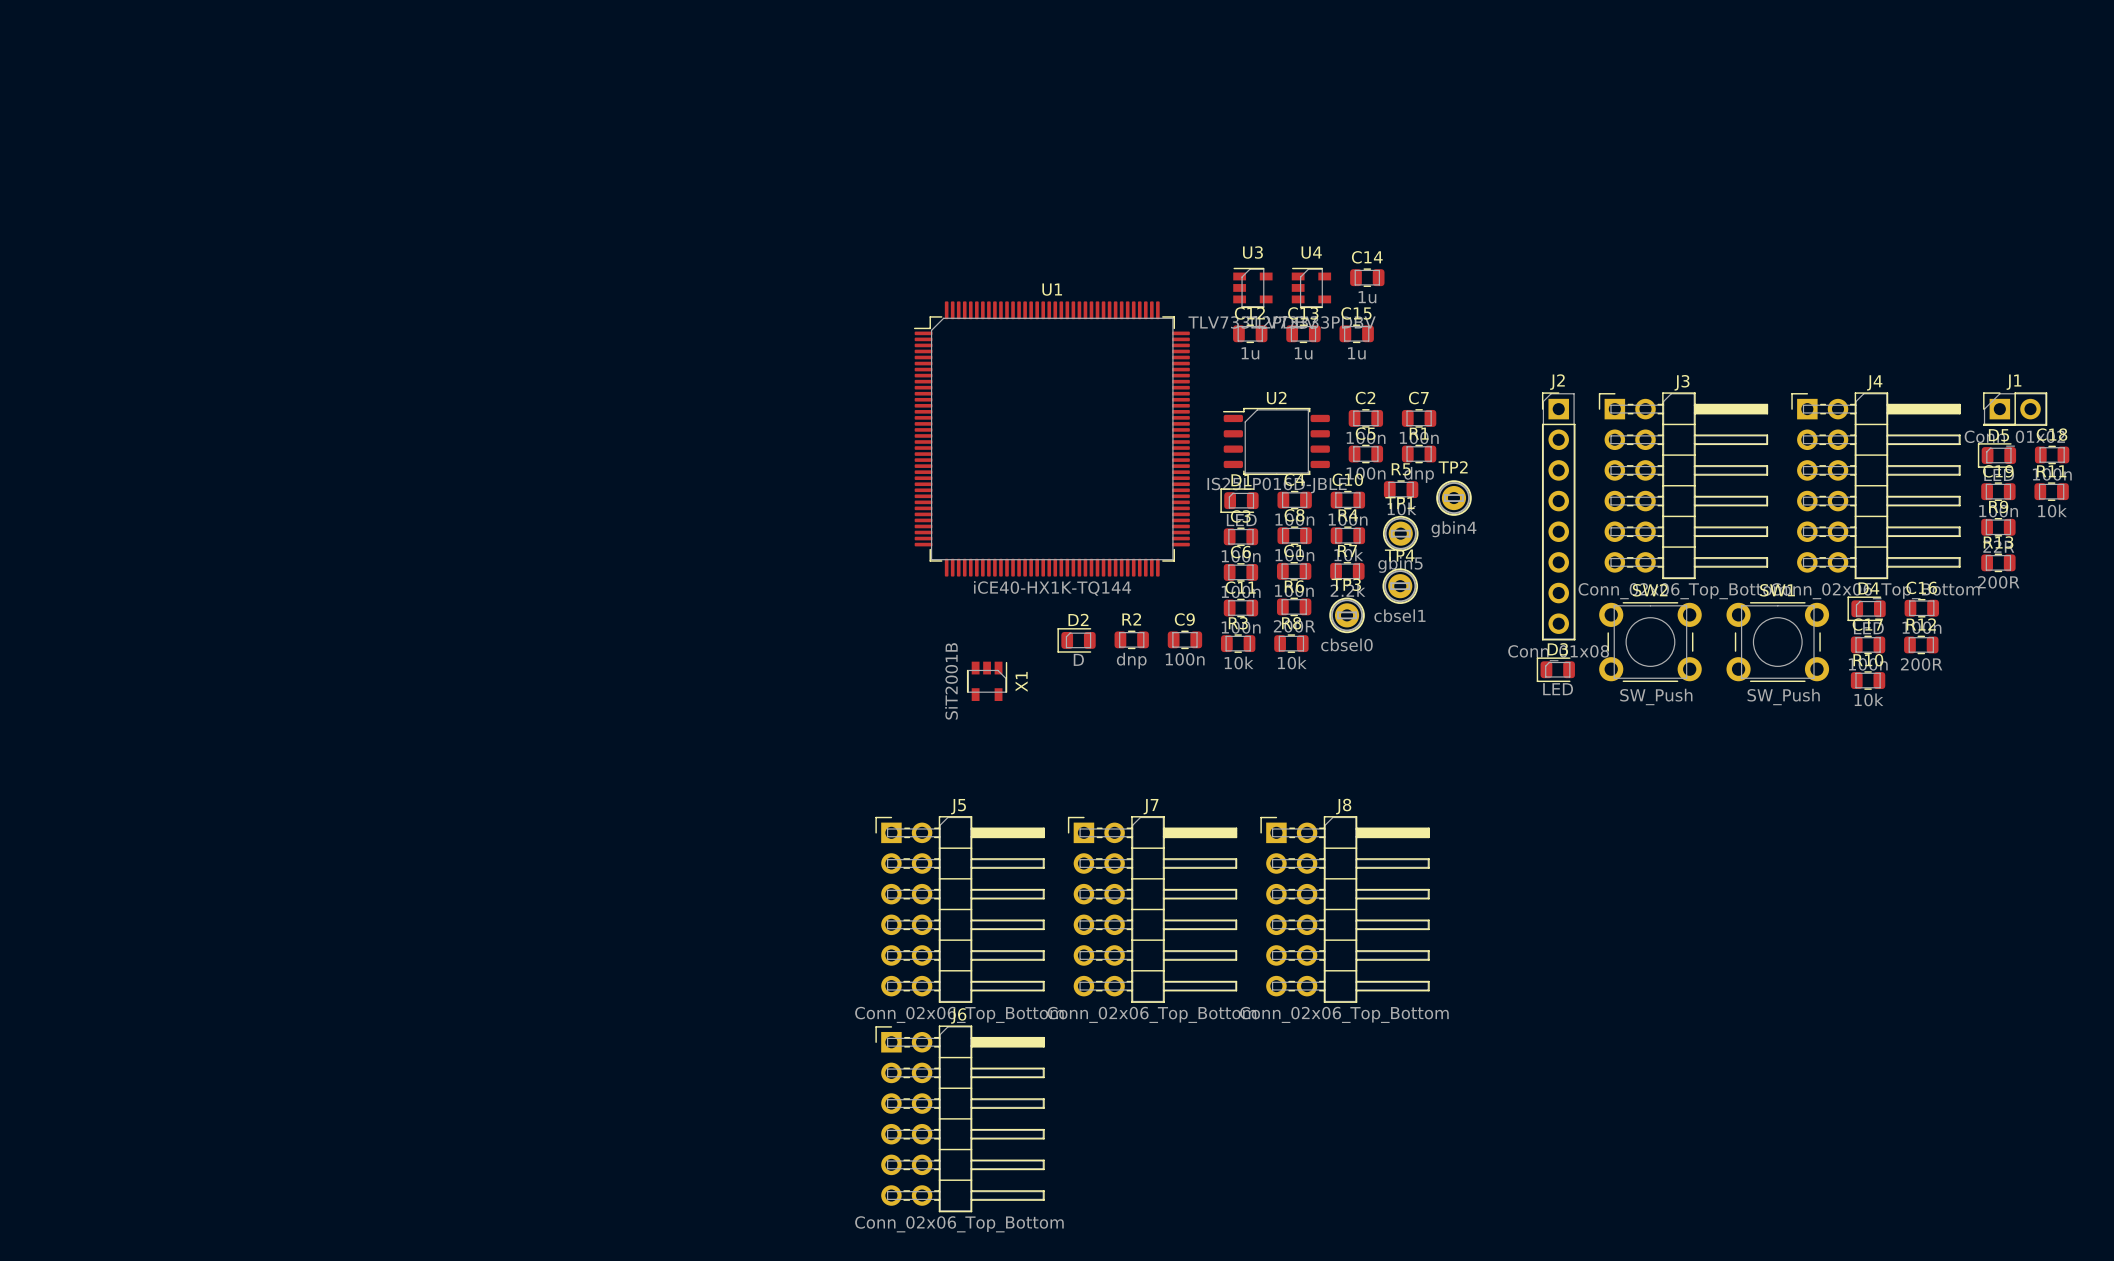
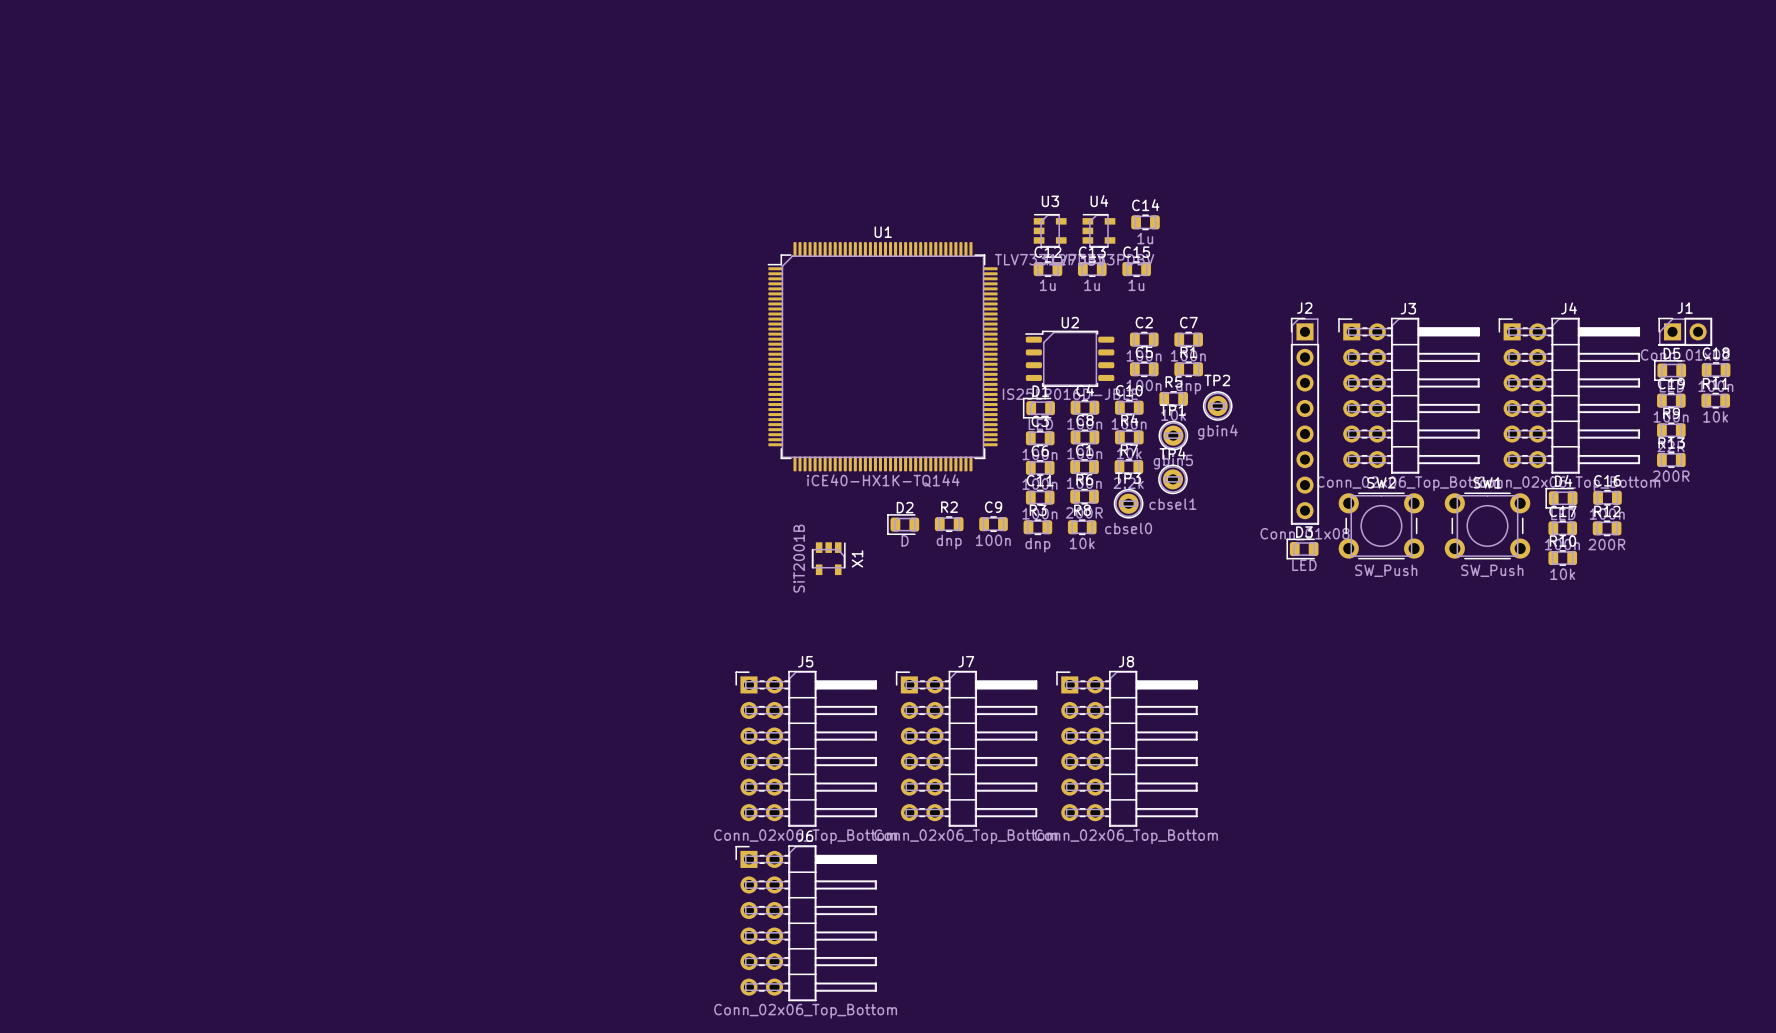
R3 value: 10k (1239, 662) -> dnp (1037, 545)

